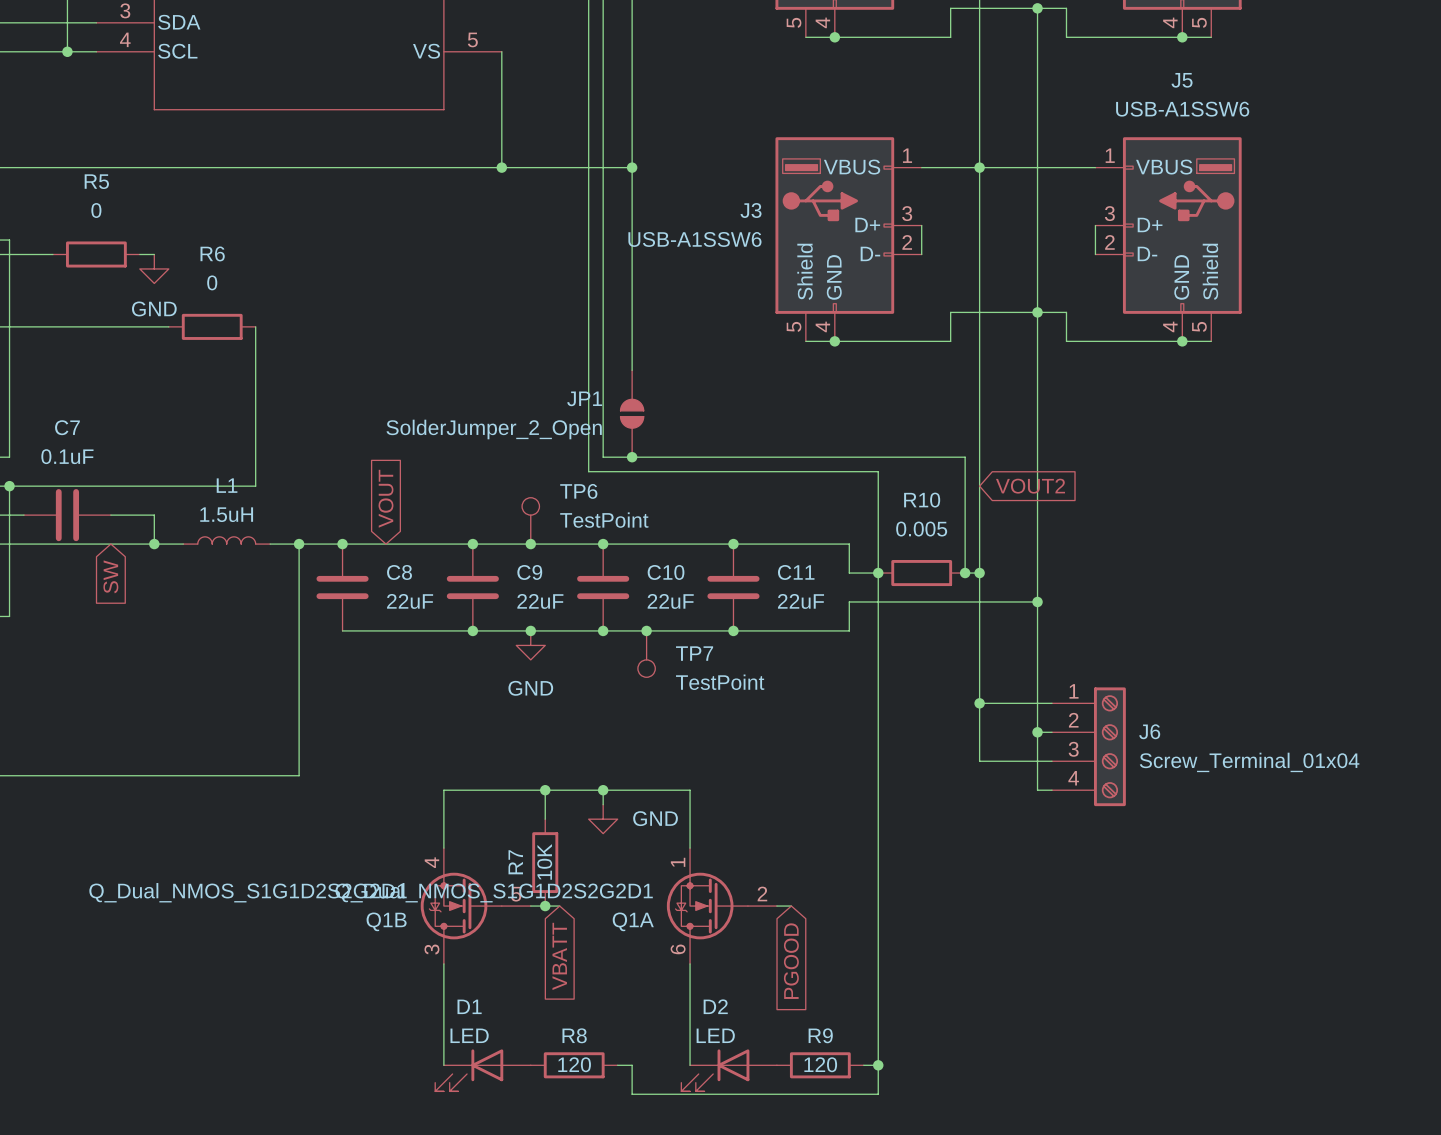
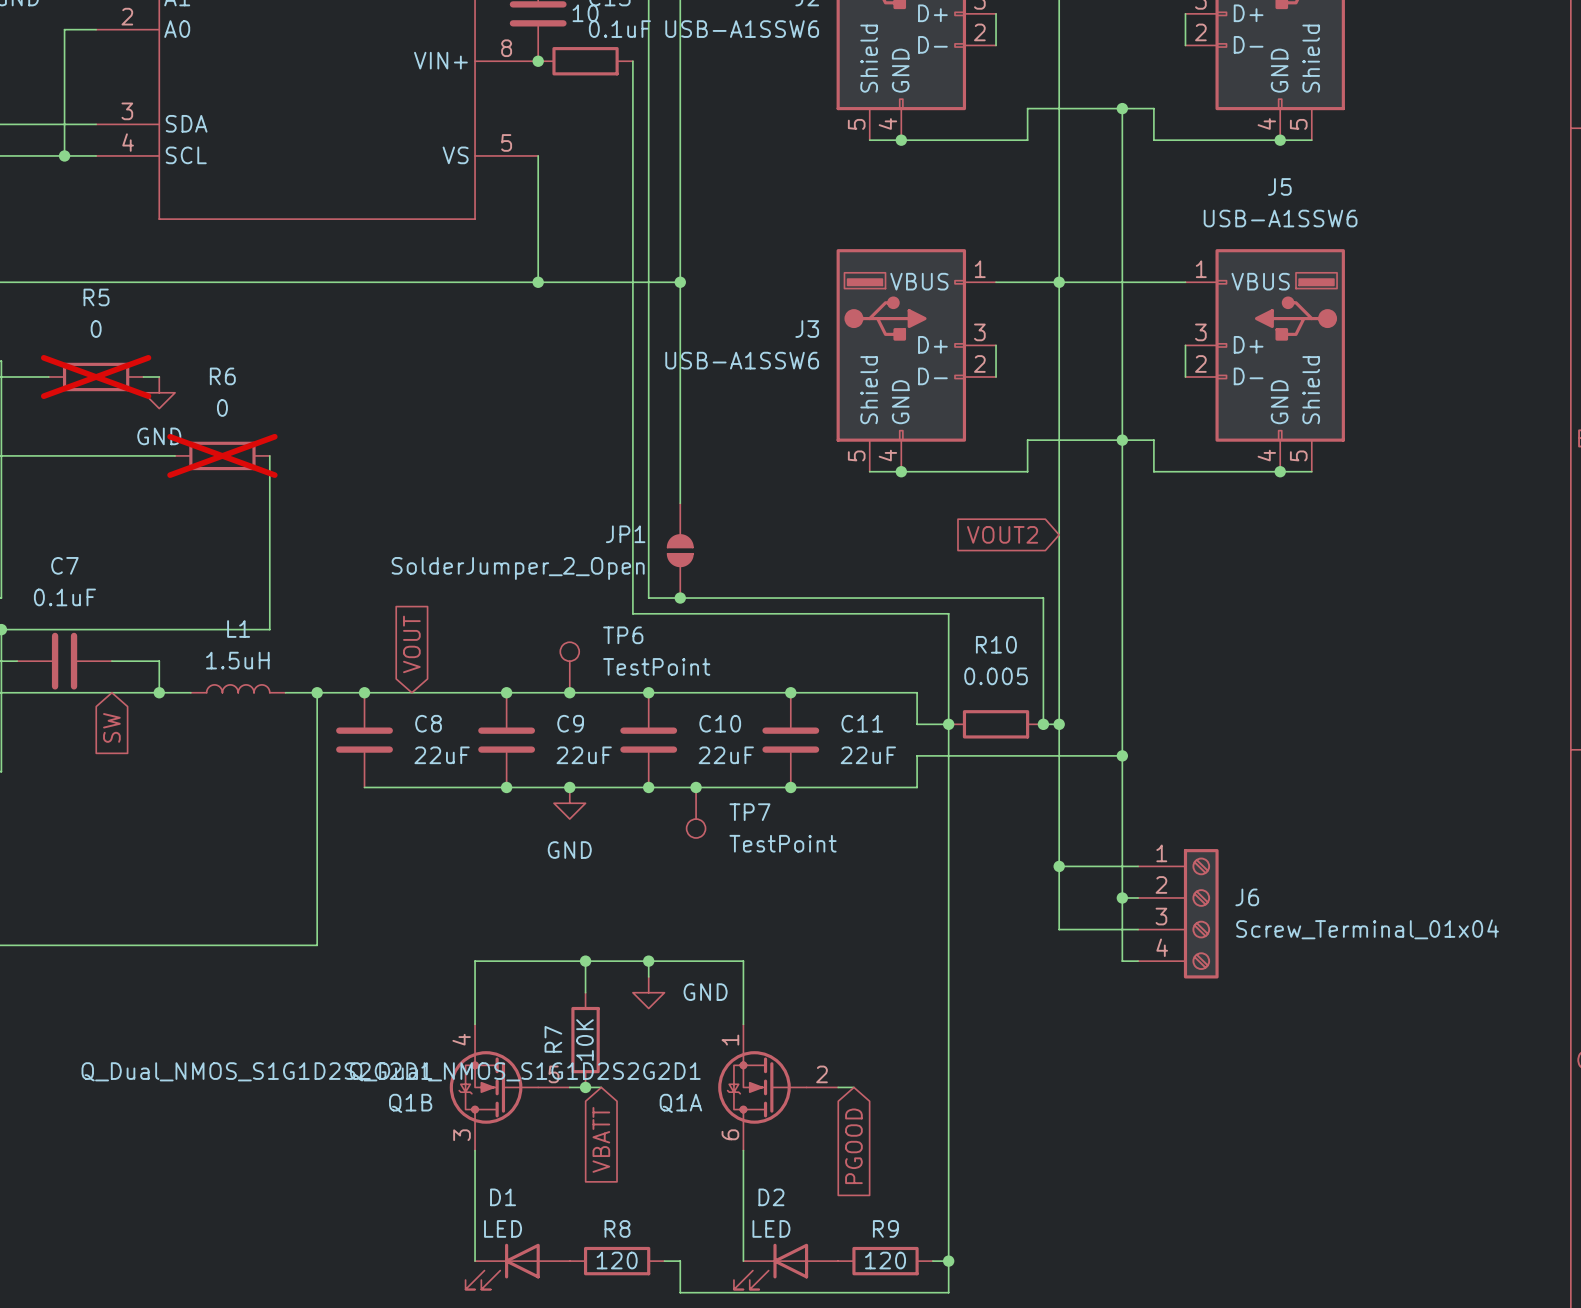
R5 do-not-place cross: none -> (96, 376)
R6 do-not-place cross: none -> (222, 455)
global label rotation: 0° (1030, 486) -> 180° (1002, 534)
global label position: VOUT2 (1030, 486) -> VOUT2 (1002, 534)

